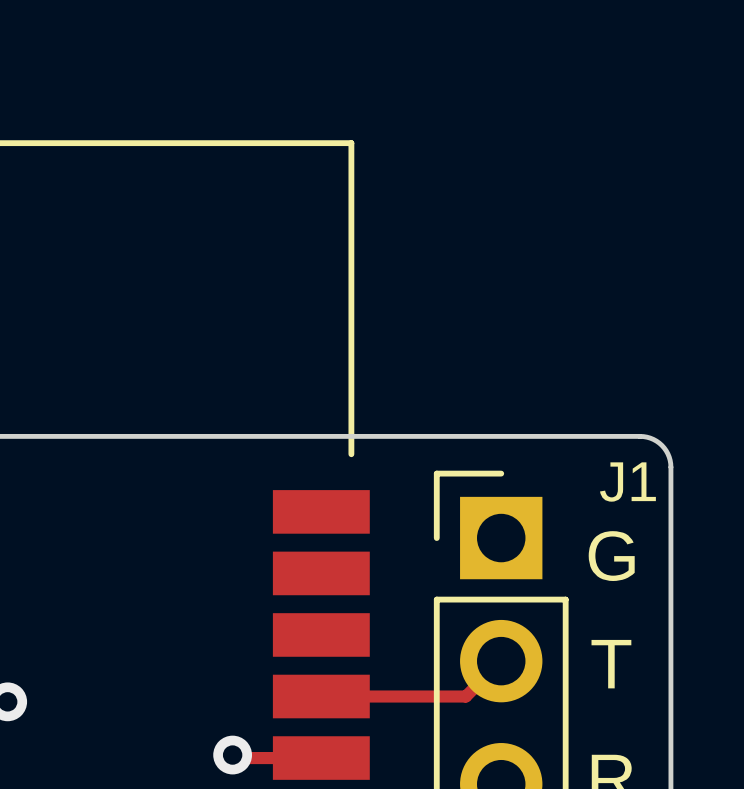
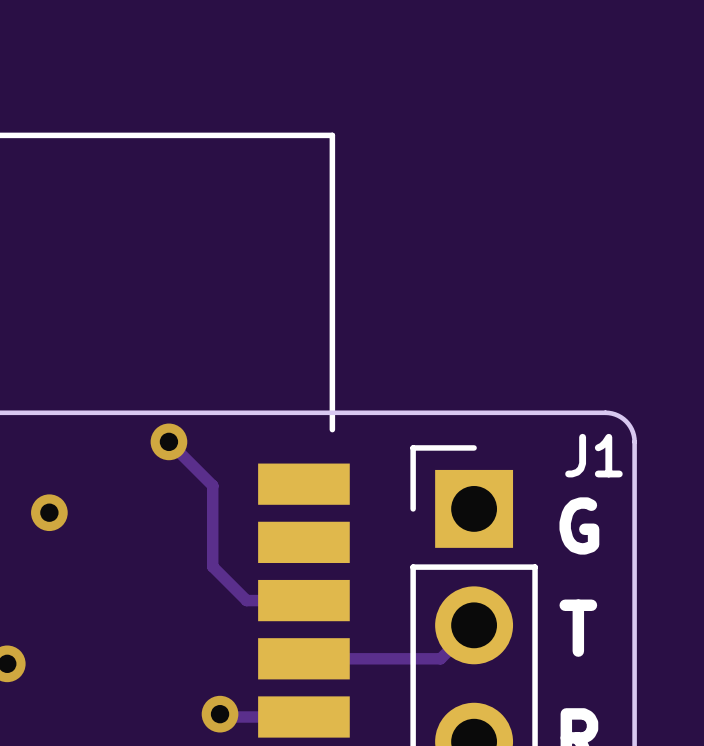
track: none -> (168, 441) (212, 485) (212, 566) (246, 600) (303, 600)
via: none -> (168, 441)
via: none -> (49, 512)

